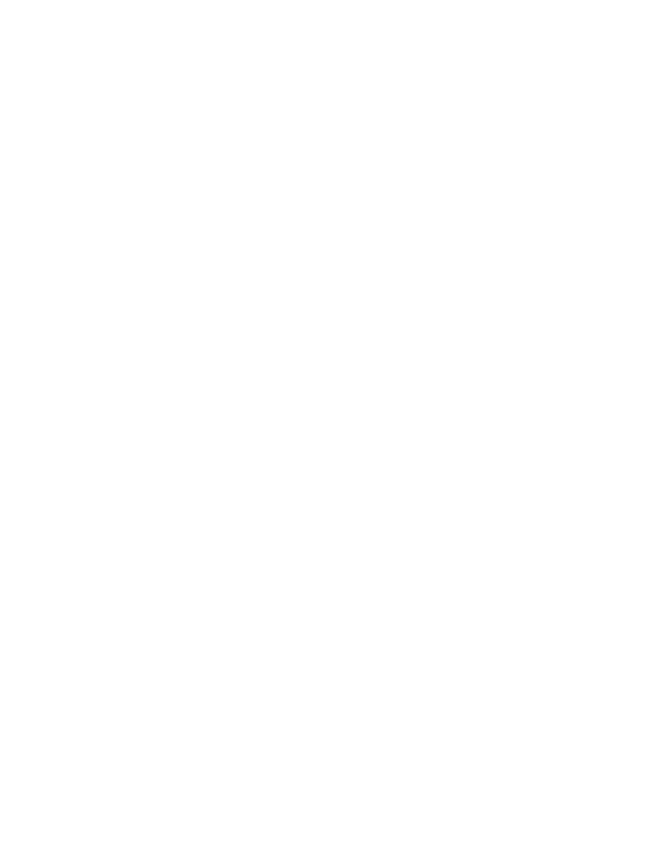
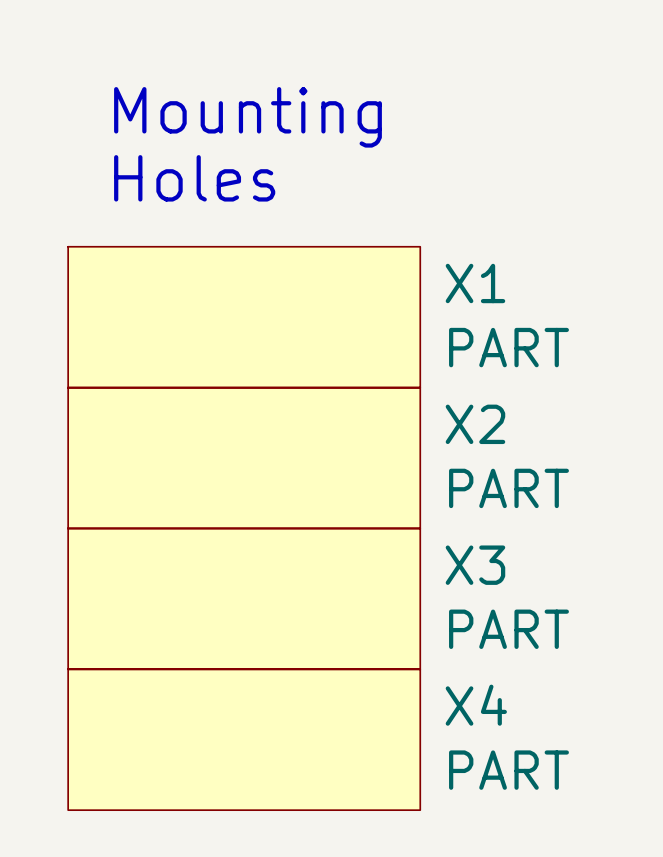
text: none -> Mounting (247, 117)
text: none -> Holes (194, 178)
X1: none -> PART (244, 317)
X2: none -> PART (244, 458)
X3: none -> PART (244, 598)
X4: none -> PART (244, 739)

